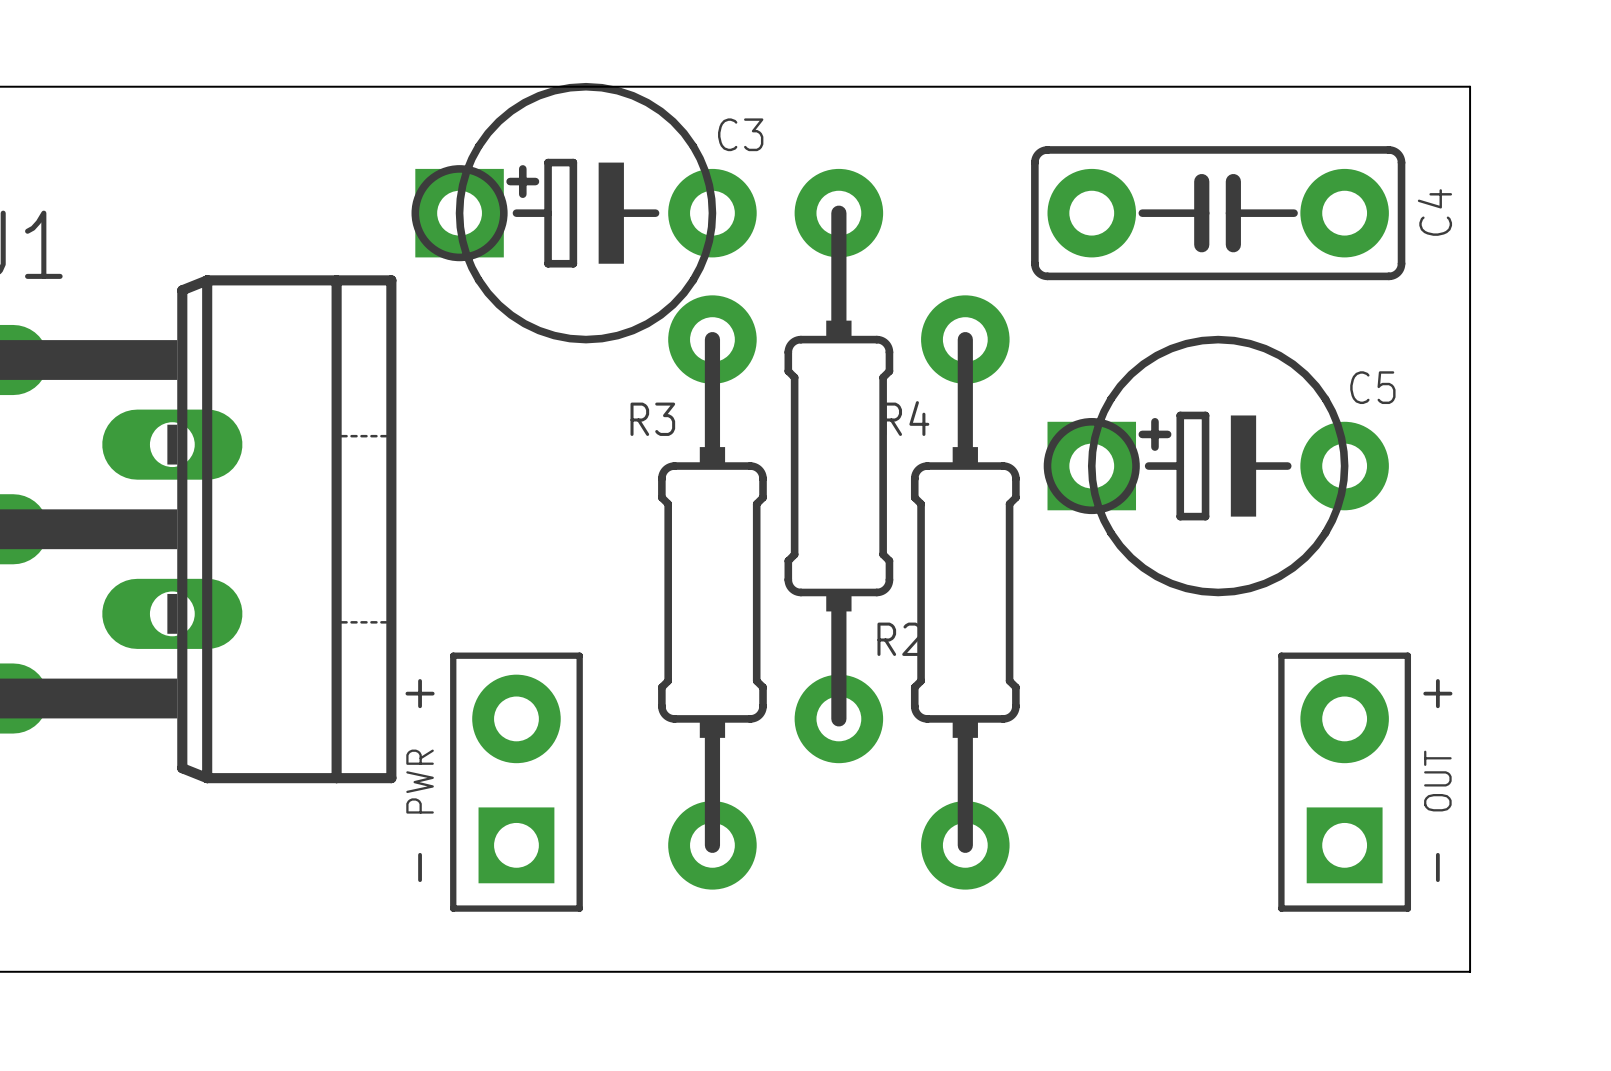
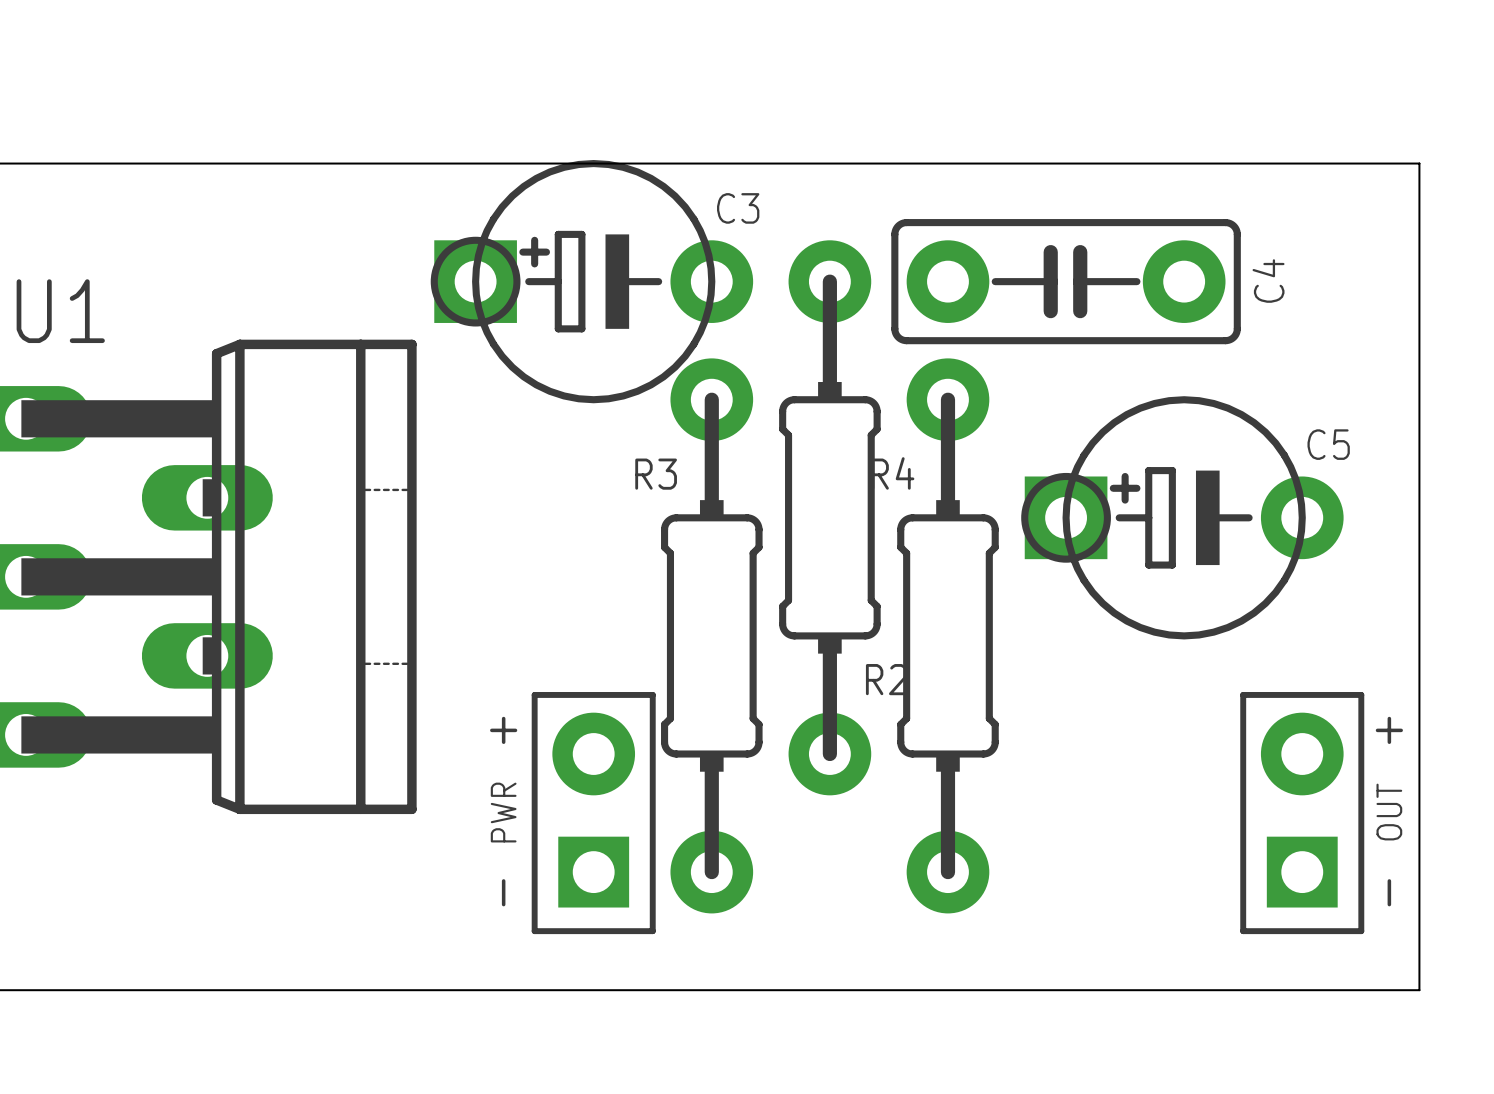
C4 position: (1218, 213) -> (1066, 281)
PWR position: (494, 782) -> (572, 813)

